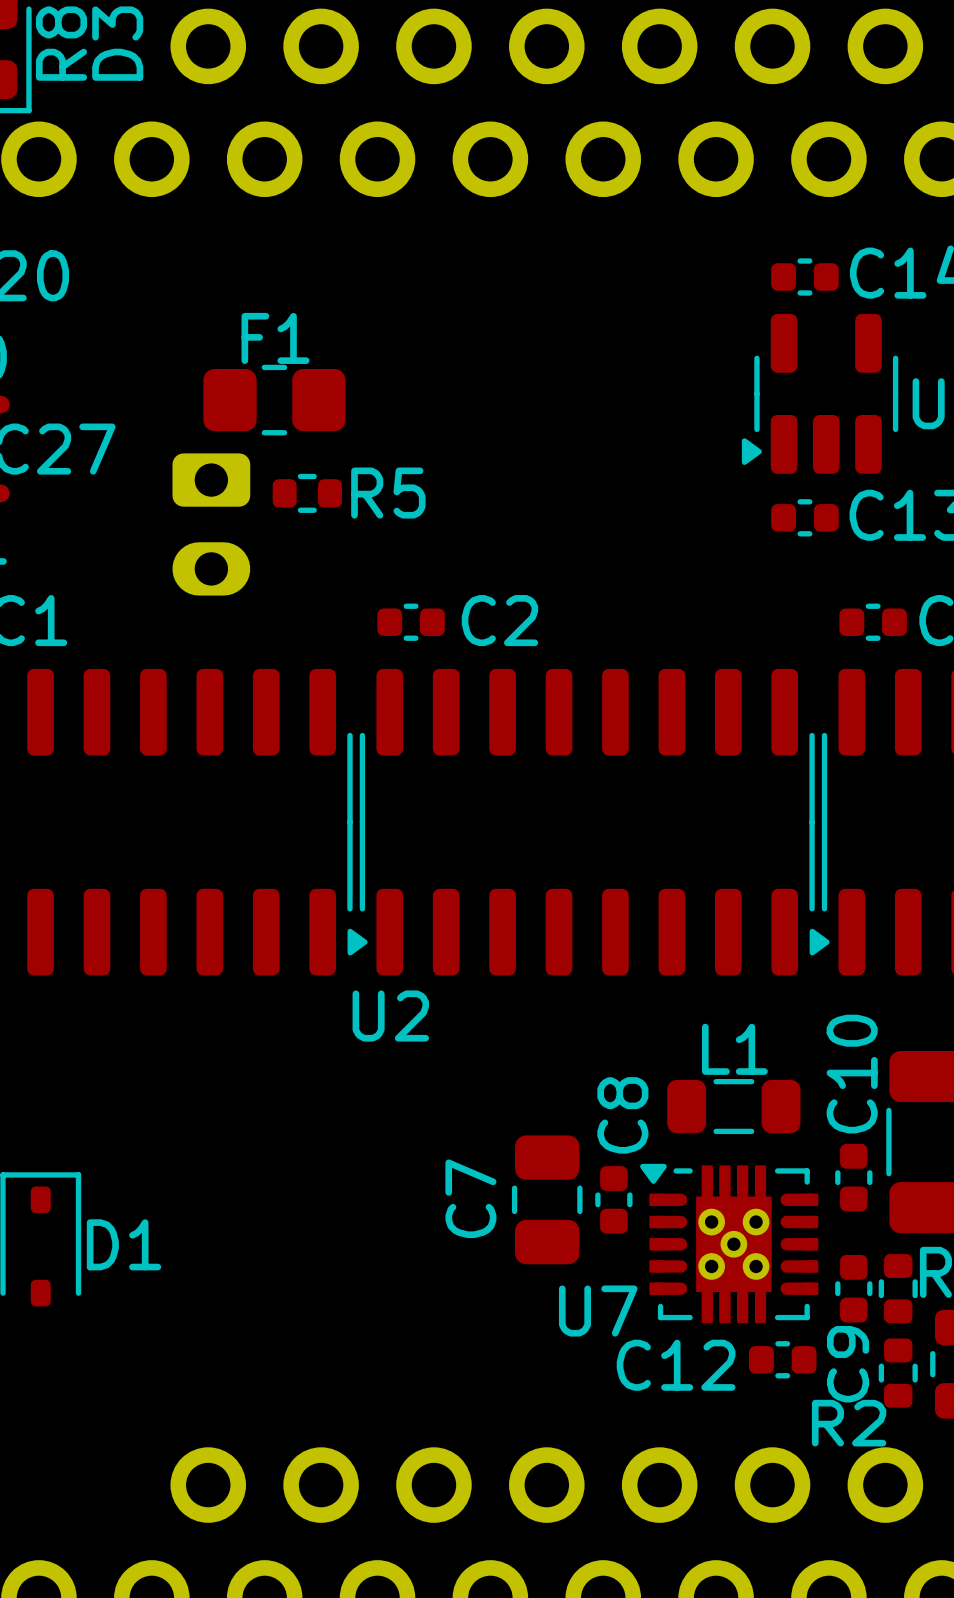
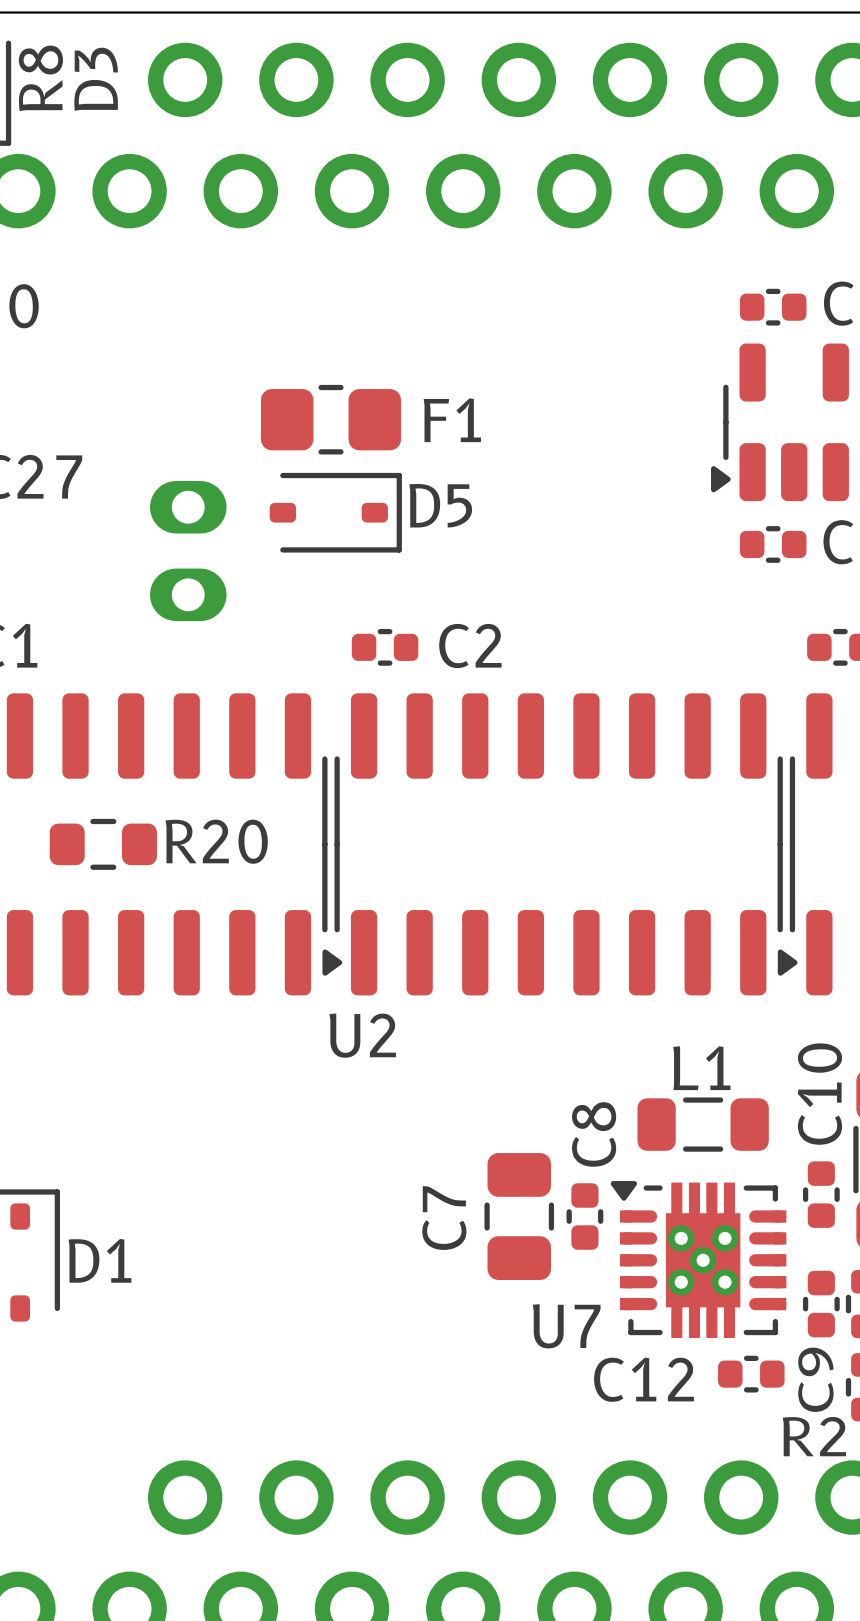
F1 name position: F1 (275, 338) -> F1 (452, 420)
F1 position: (274, 400) -> (331, 419)
part footprint: [172, 453, 251, 596] -> [149, 480, 227, 622]
D5: none -> (335, 512)
R5: (307, 493) -> none
R20: none -> (103, 844)

